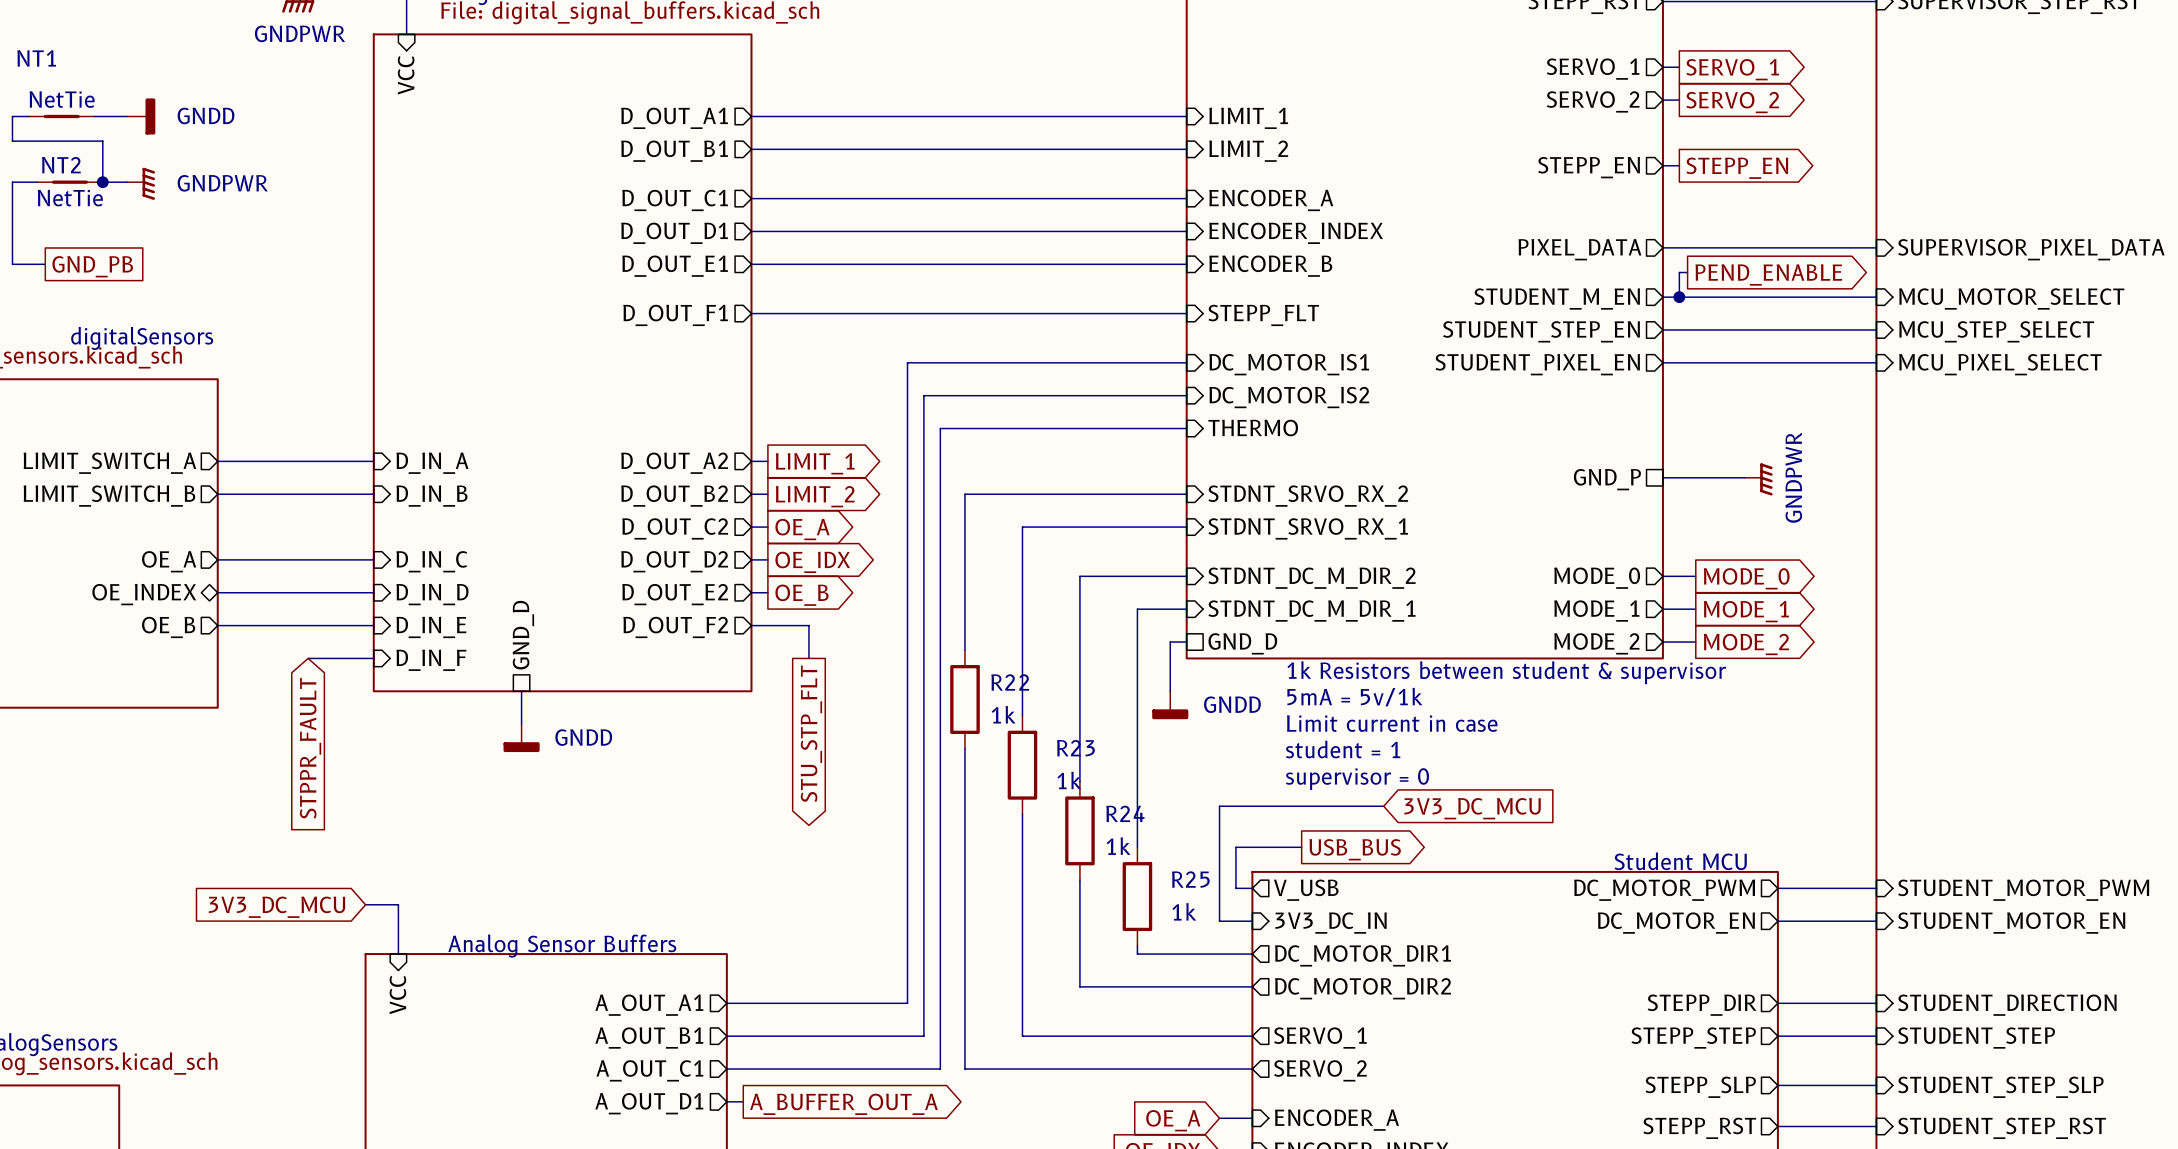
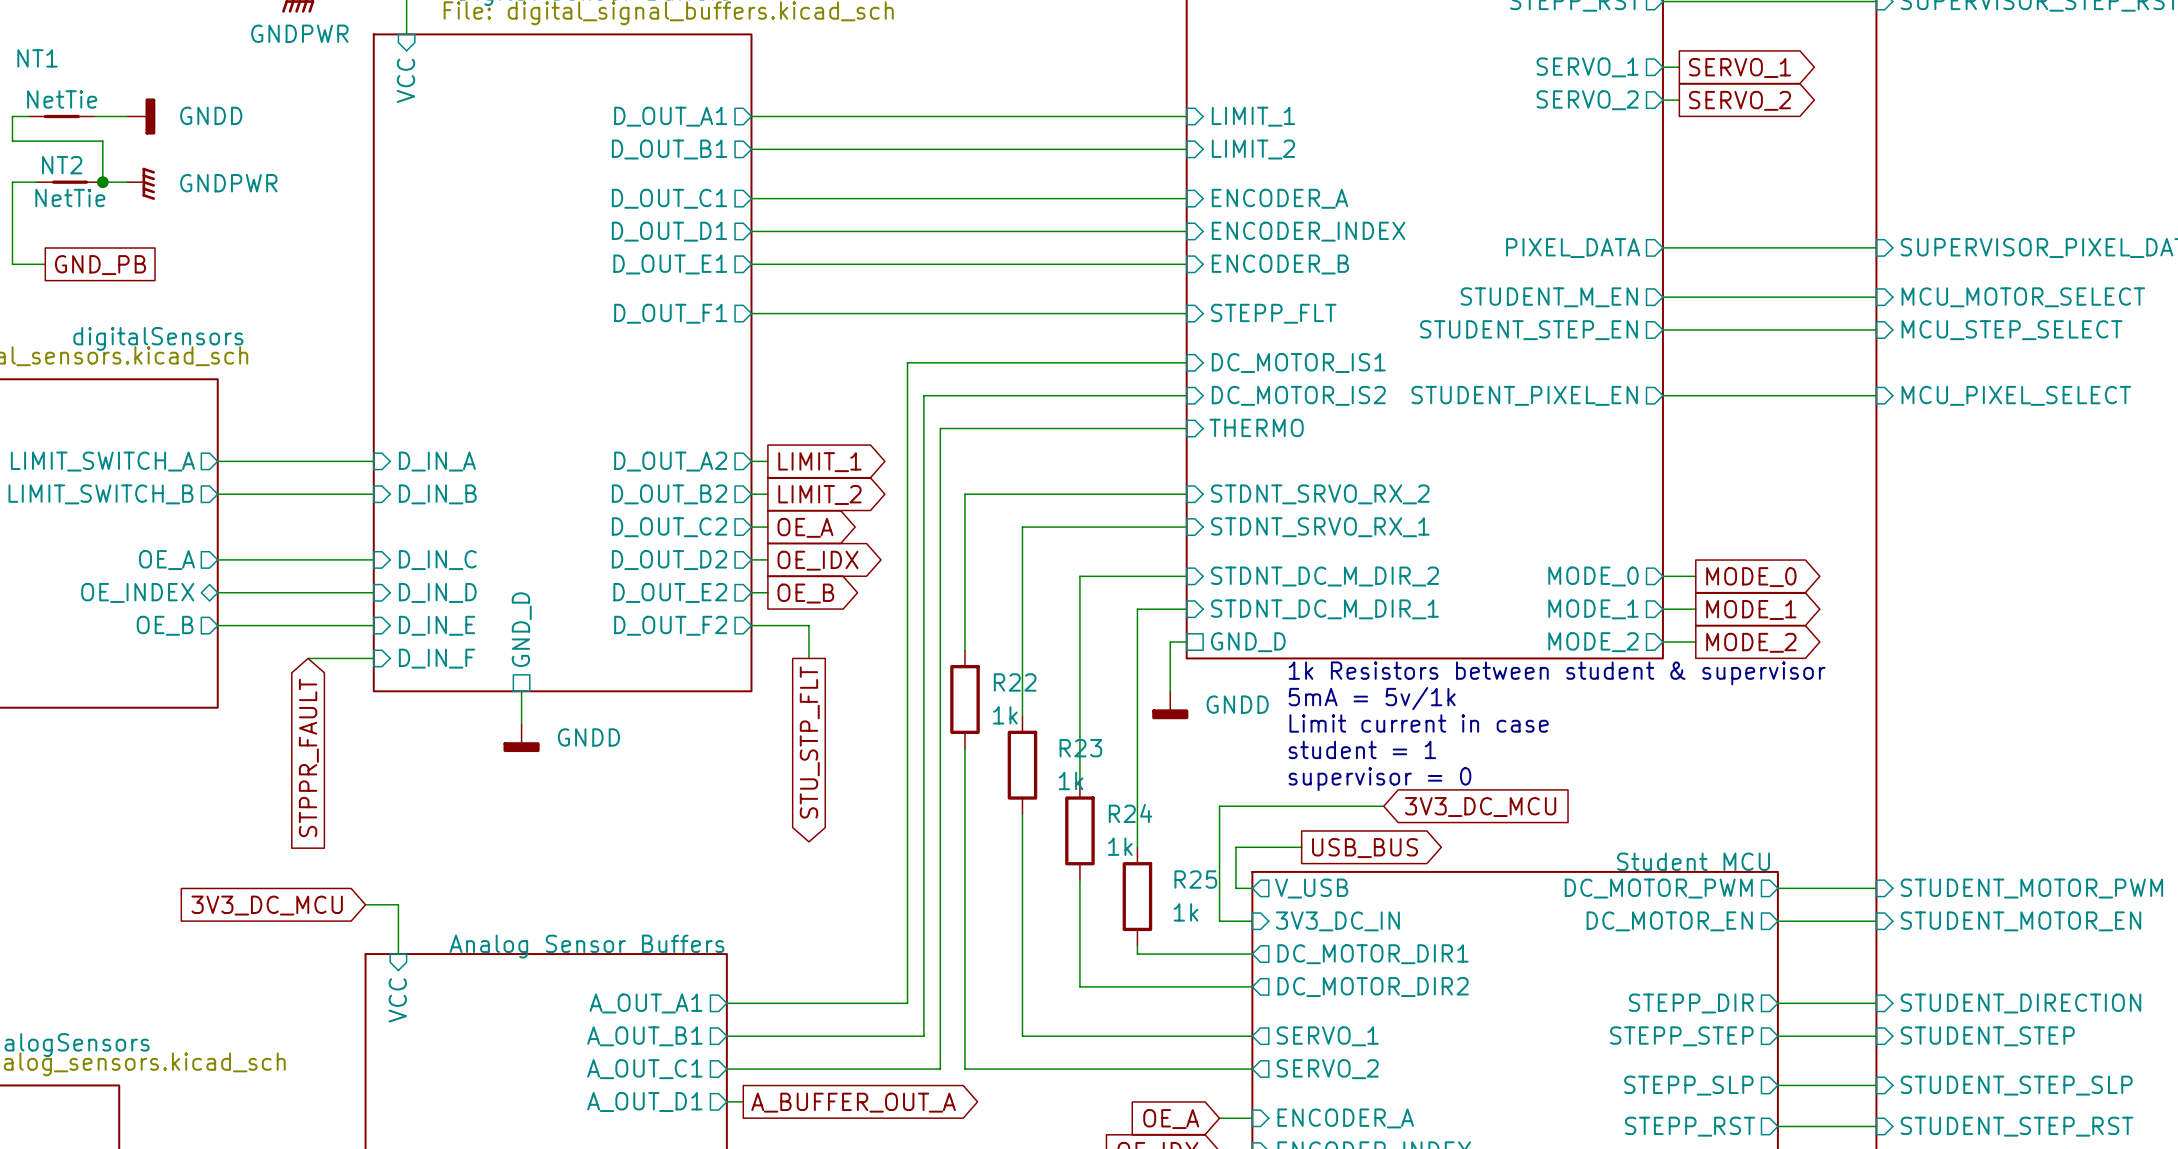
wire: (1662, 165) (1679, 165) -> none
sheet pin: STEPP_EN (1589, 167) -> none
global label: STEPP_EN (1737, 168) -> none
wire: (1687, 272) (1679, 272) (1679, 297) -> none
global label: PEND_ENABLE (1768, 274) -> none
junction: (1679, 297) -> none
wire: (1662, 362) (1876, 362) -> (1662, 395) (1876, 395)
sheet pin position: STUDENT_PIXEL_EN (1537, 364) -> STUDENT_PIXEL_EN (1524, 395)
sheet pin position: MCU_PIXEL_SELECT (2000, 364) -> MCU_PIXEL_SELECT (2016, 395)
wire: (1662, 477) (1745, 477) -> none
sheet pin: GND_P (1607, 479) -> none
power symbol: GNDPWR (1758, 479) -> none

